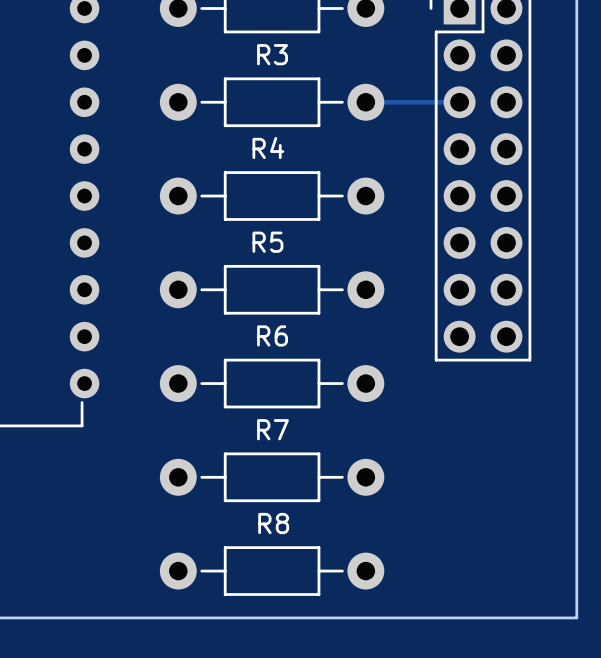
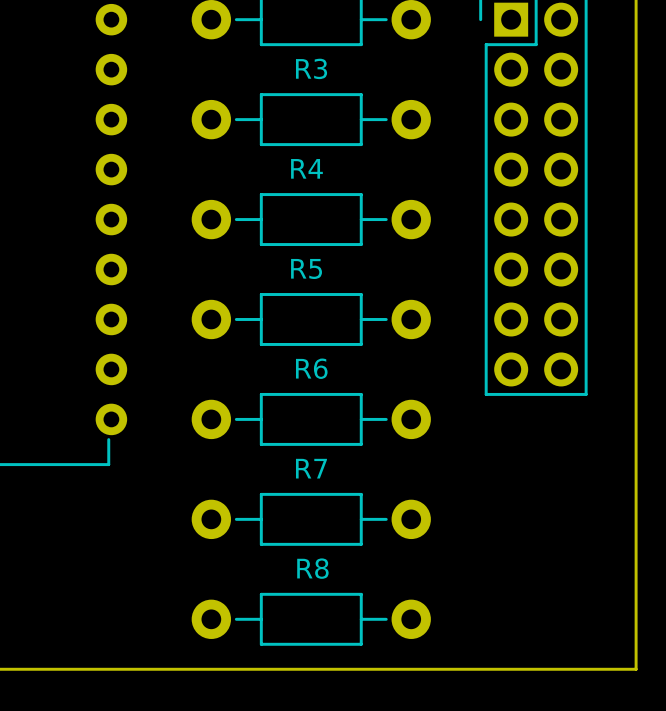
track: (365, 102) (459, 102) -> none

